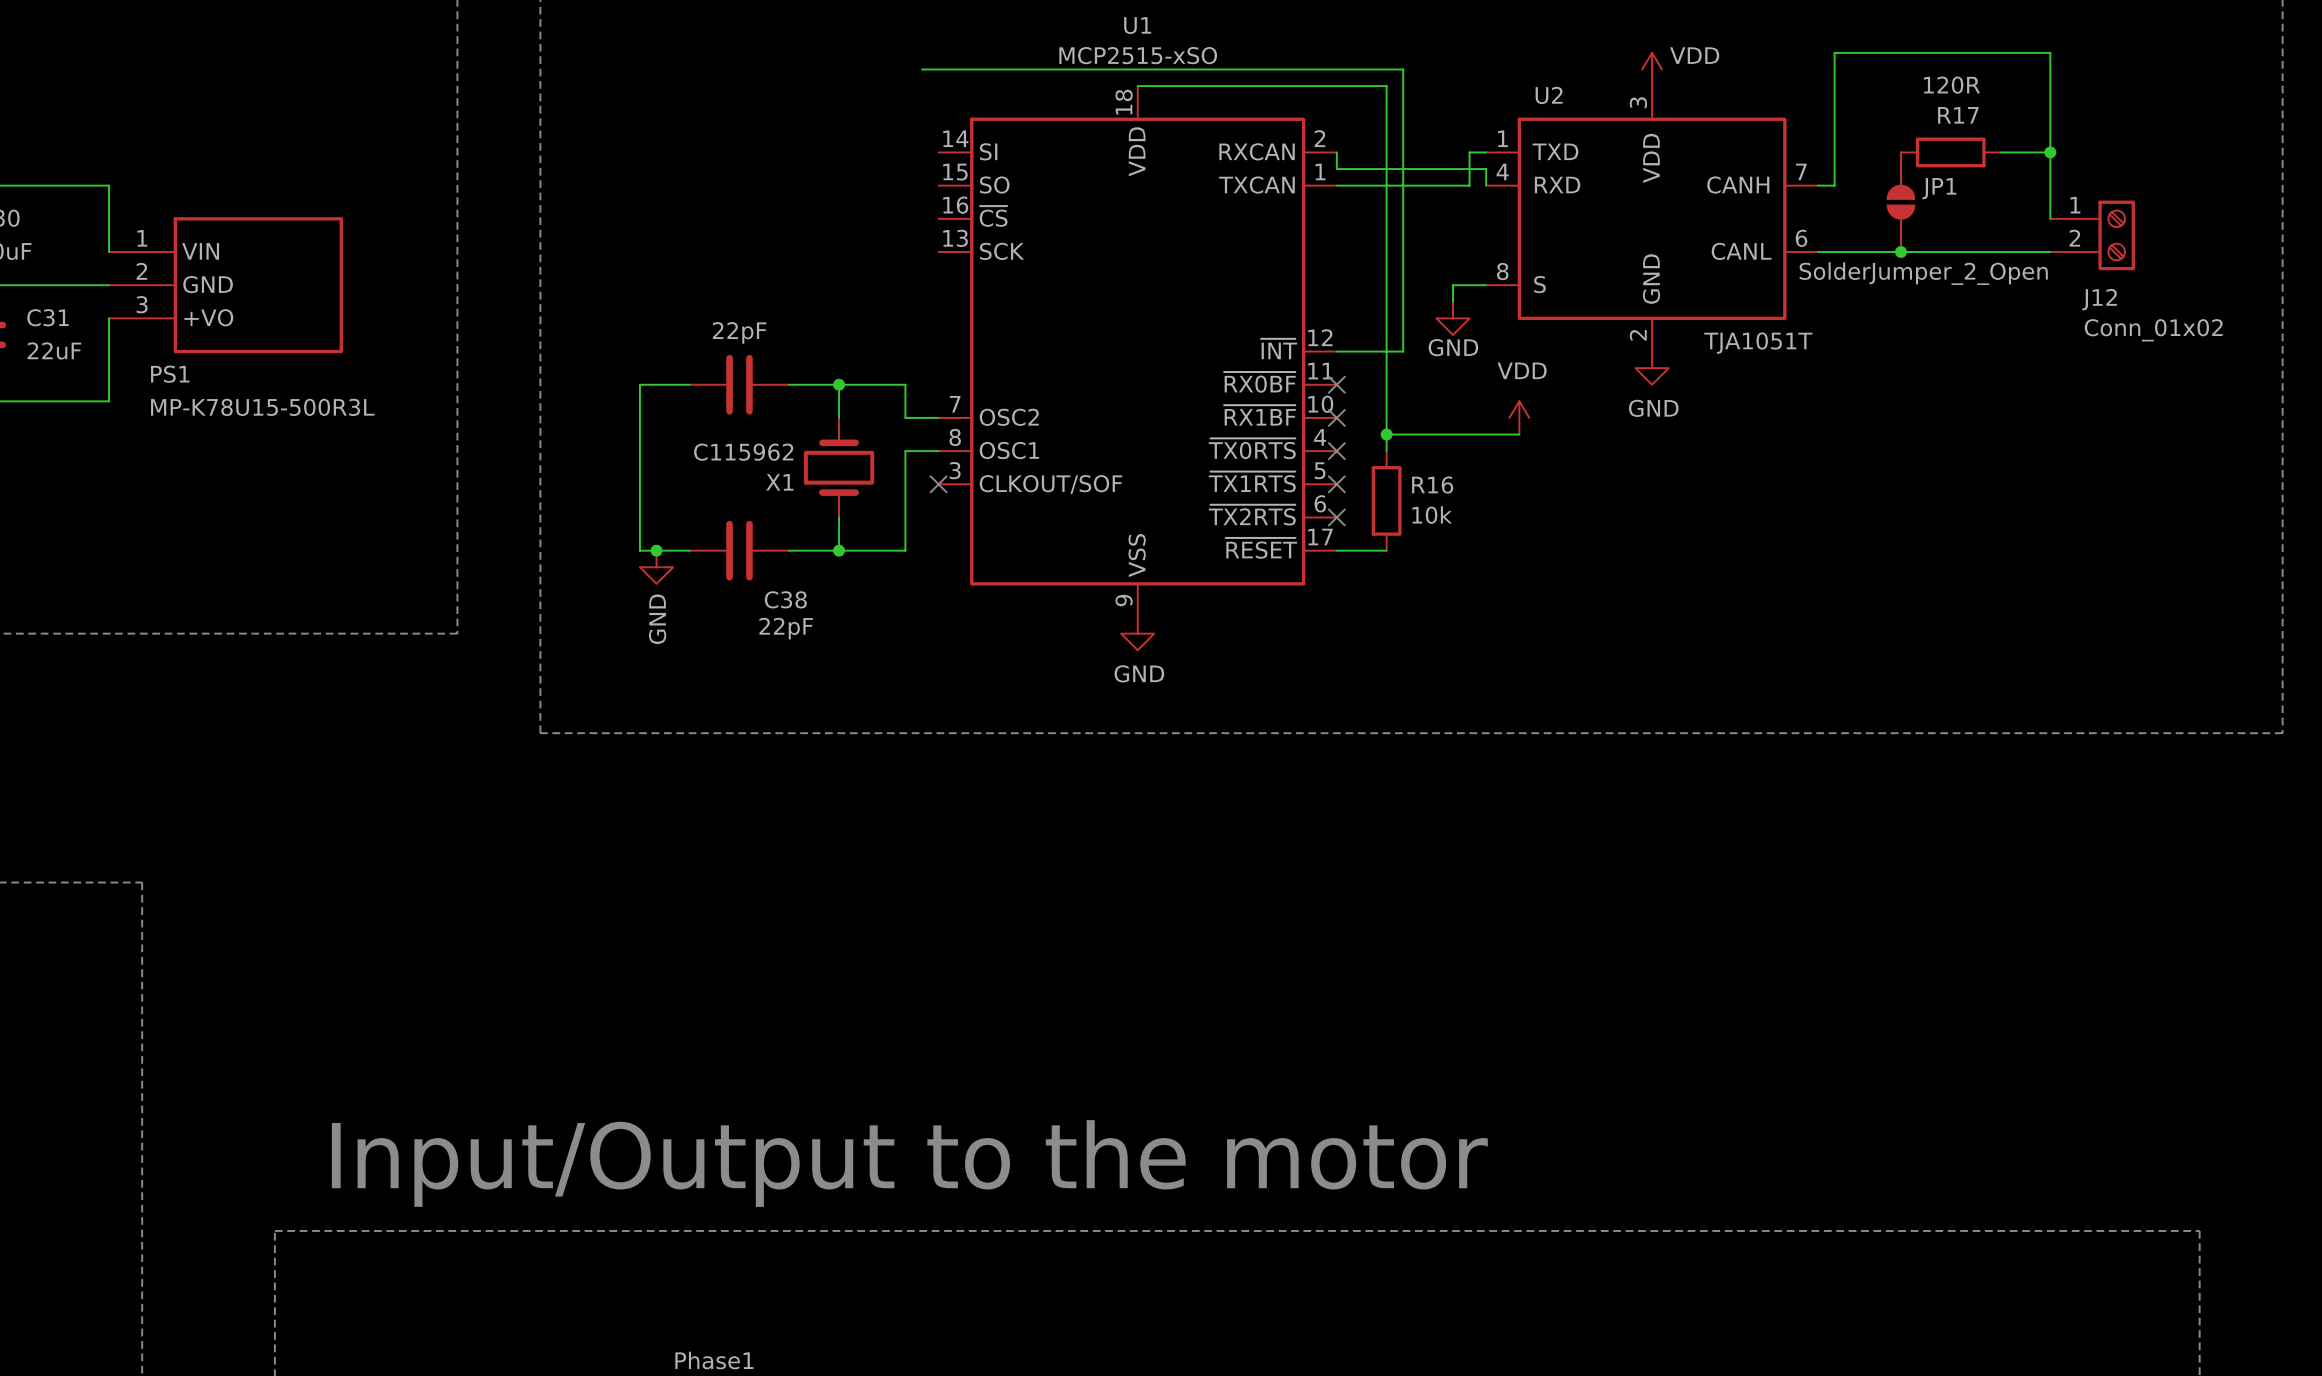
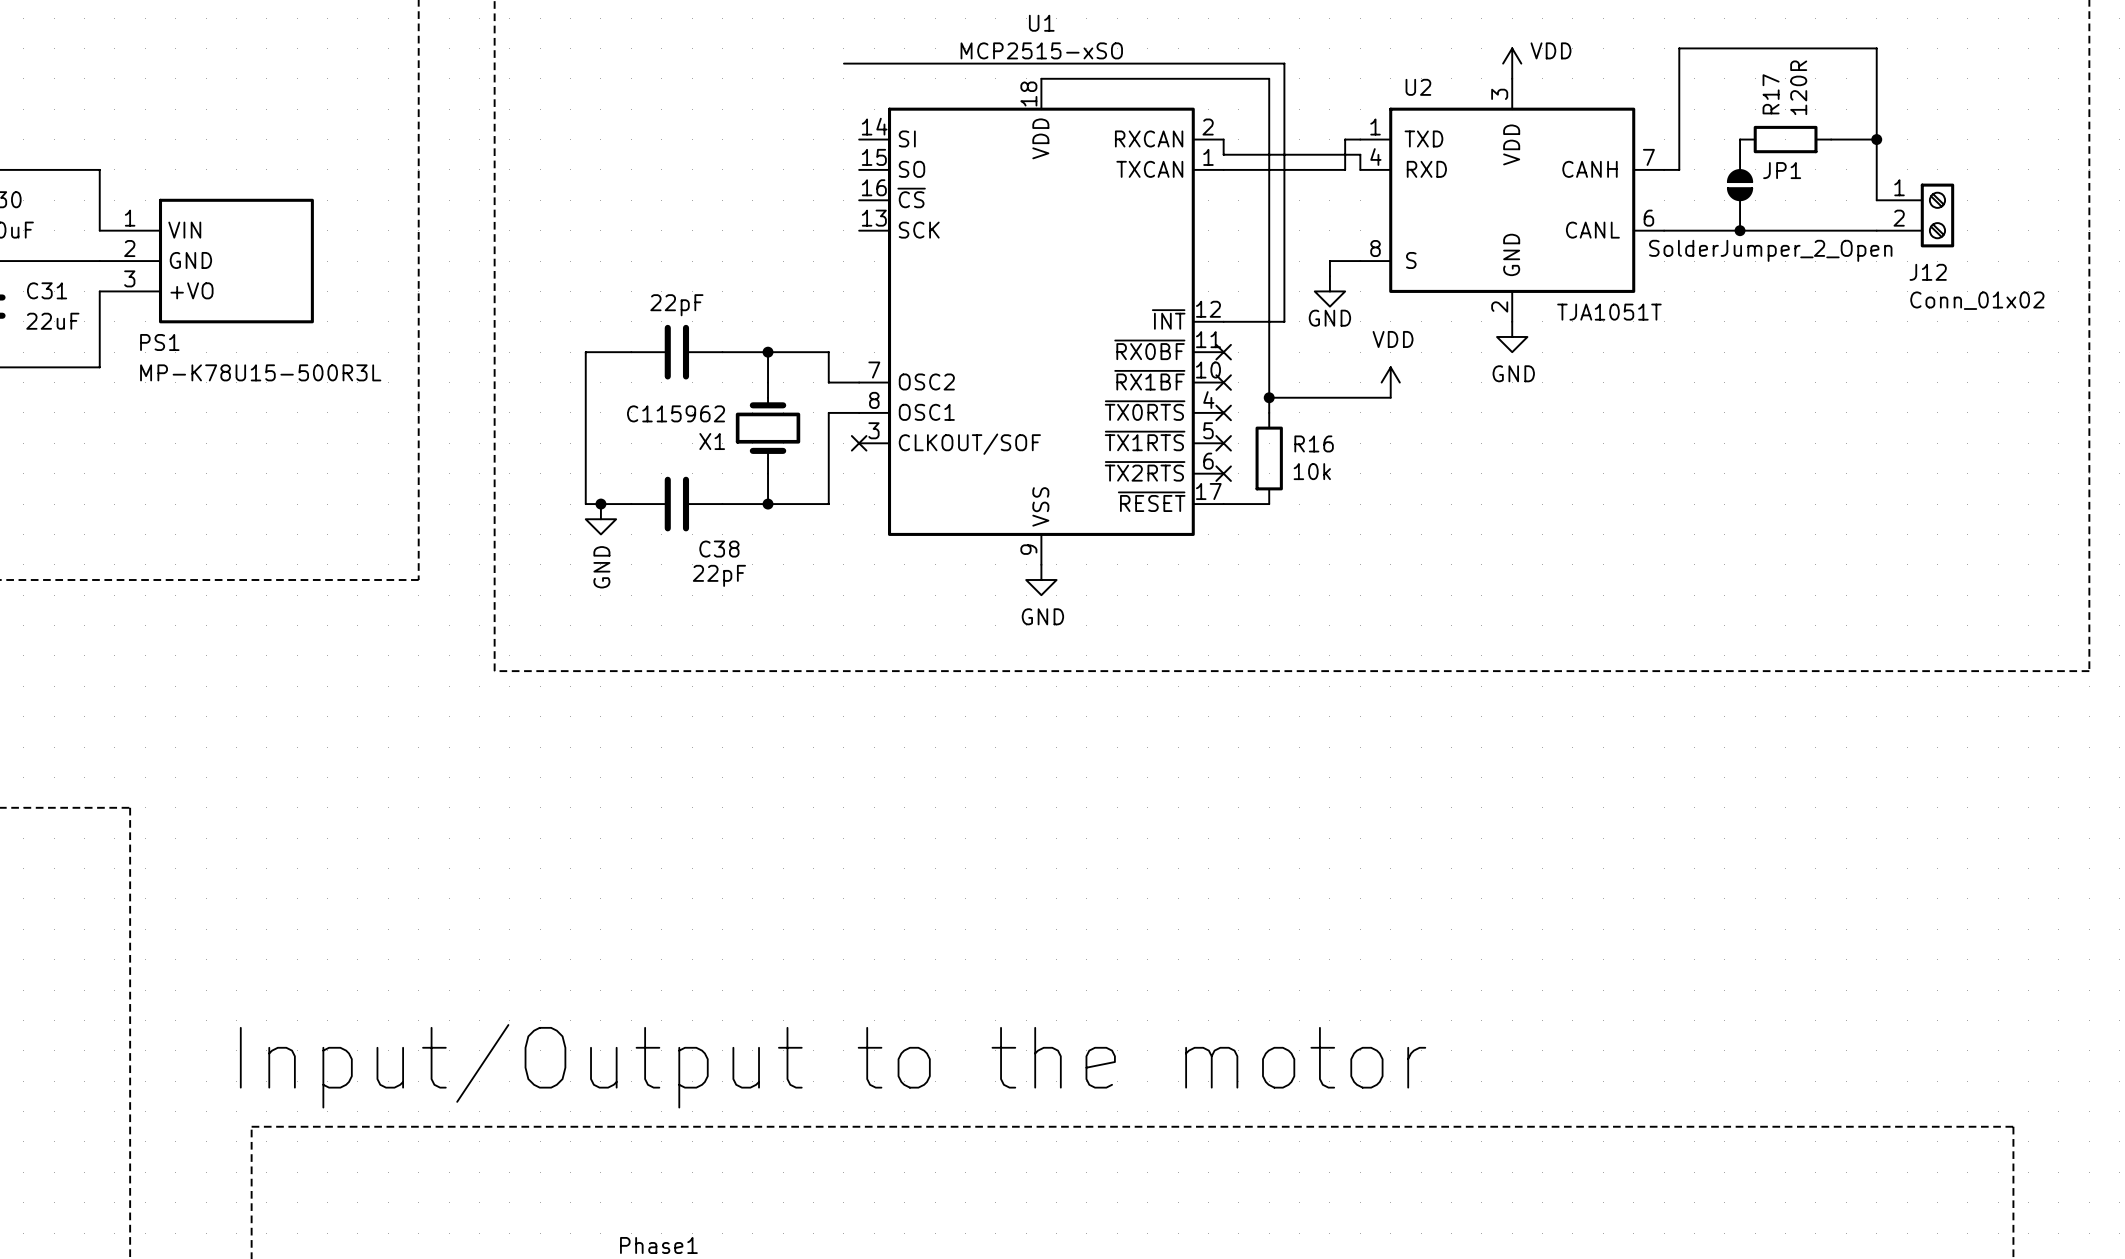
R17 value rotation: 0° (1951, 85) -> 90° counterclockwise (1798, 87)
R17 name rotation: 0° (1958, 115) -> 90° counterclockwise (1771, 94)

